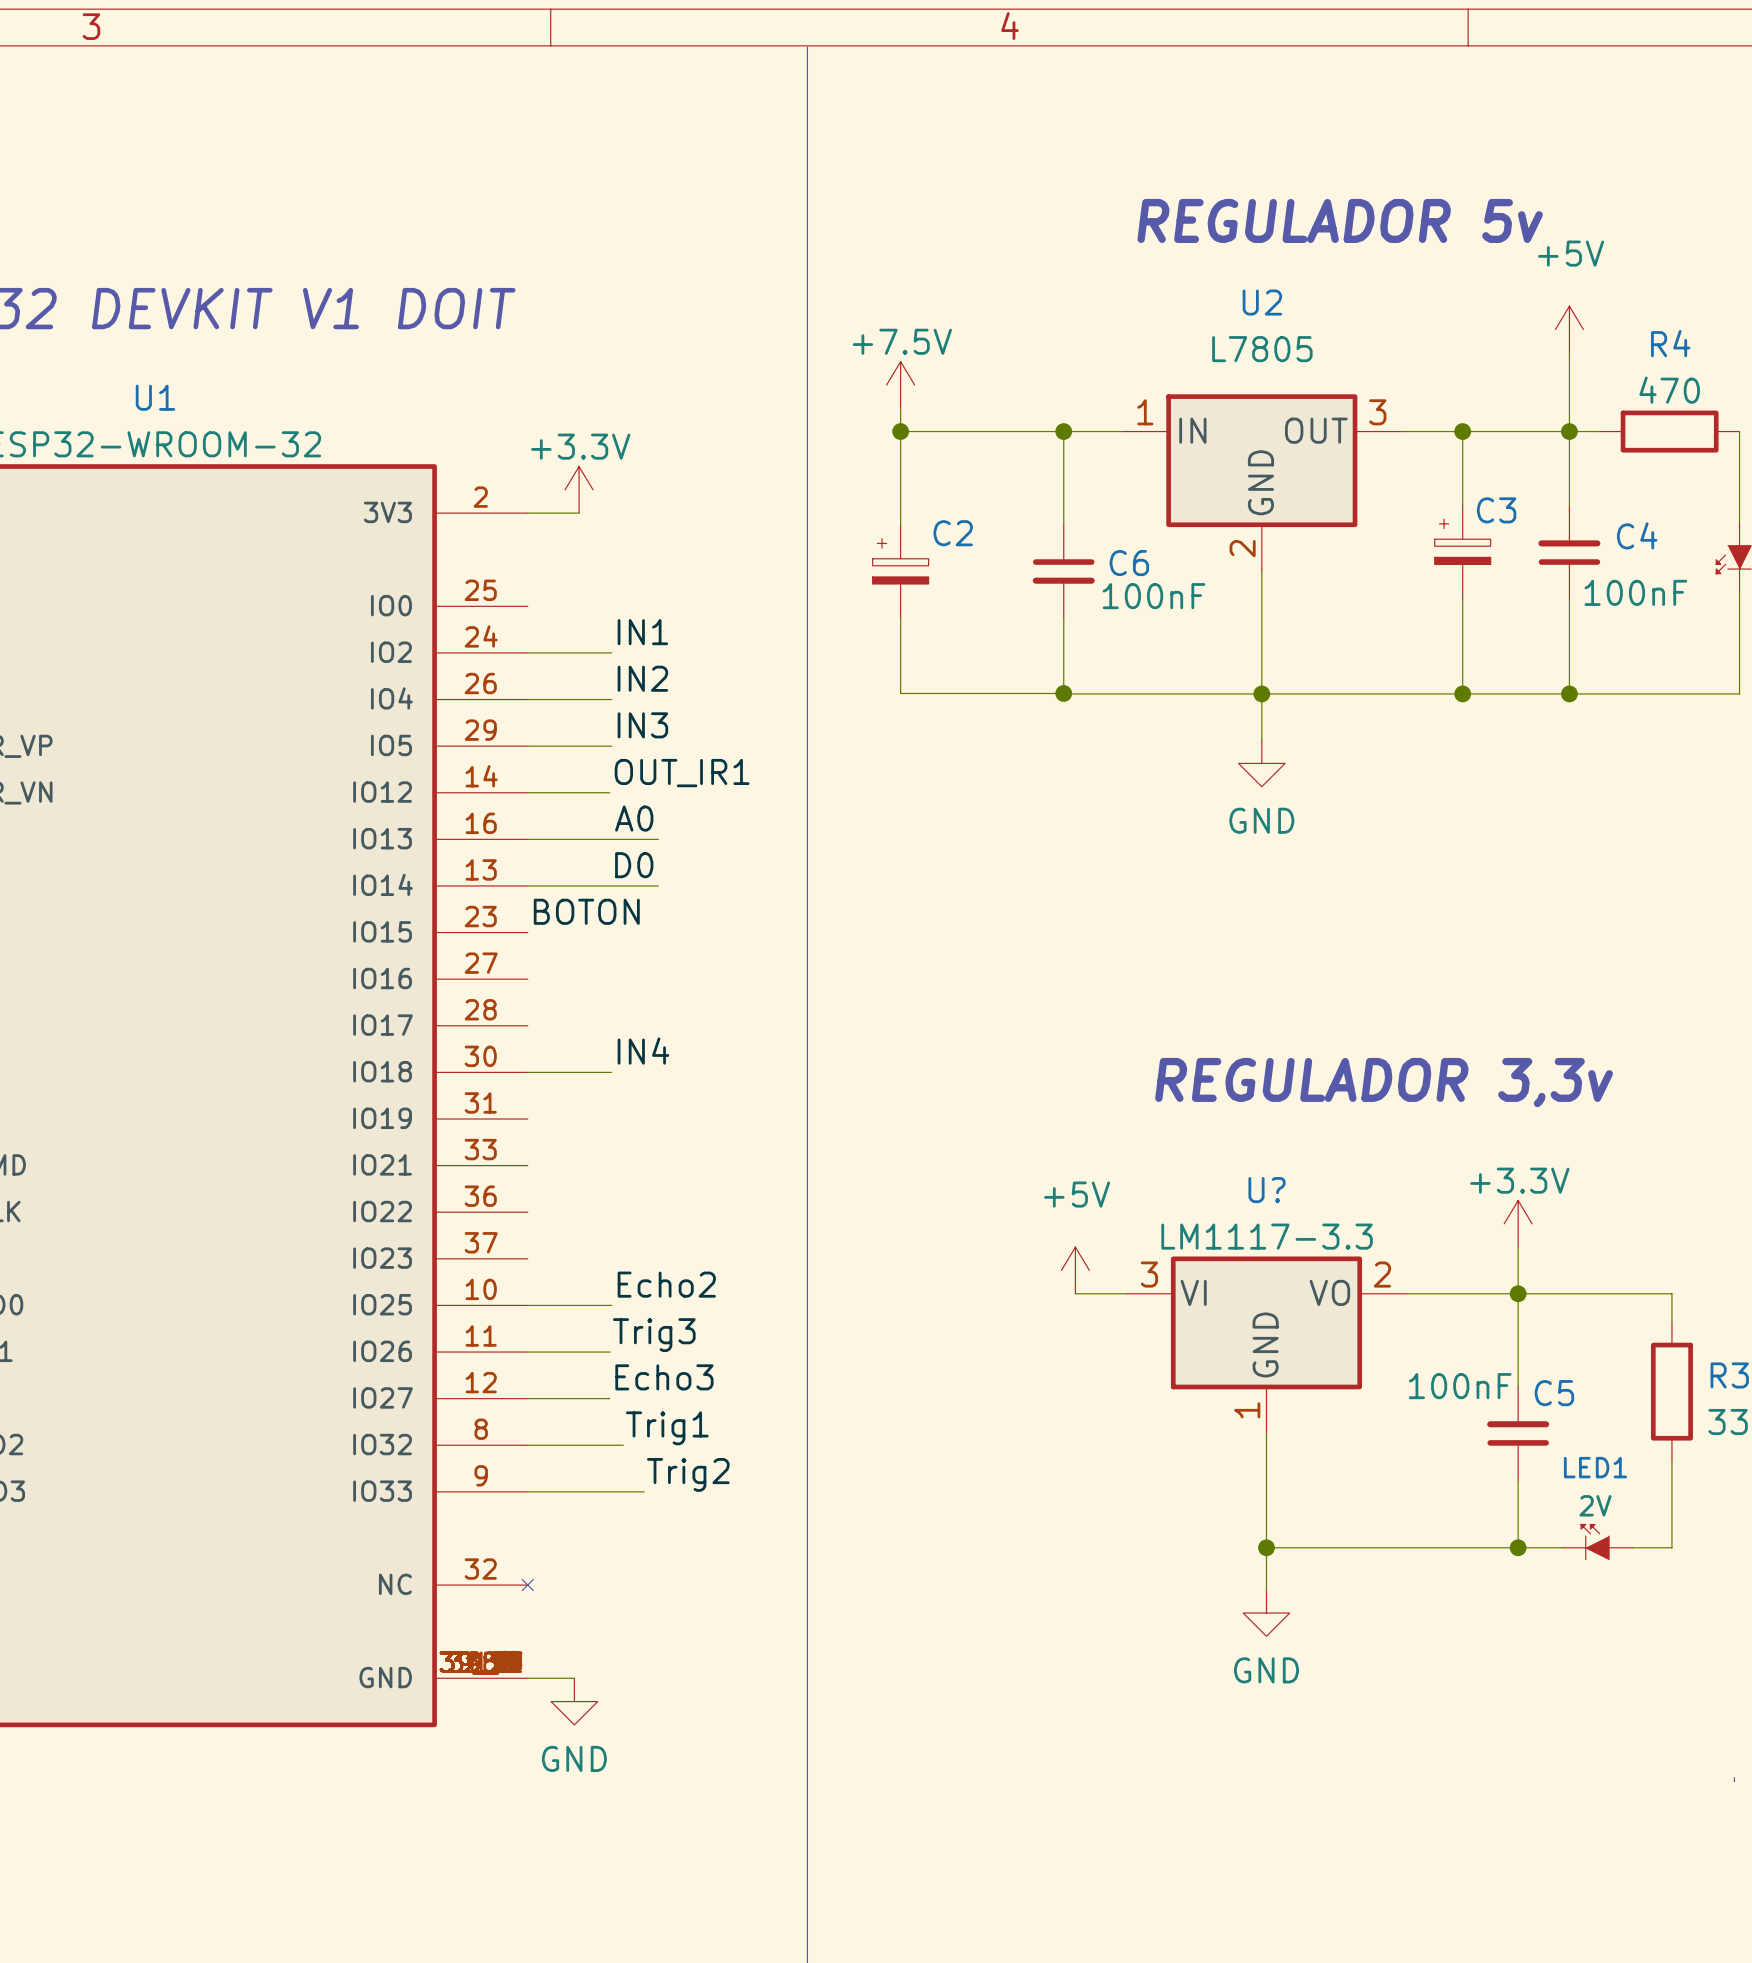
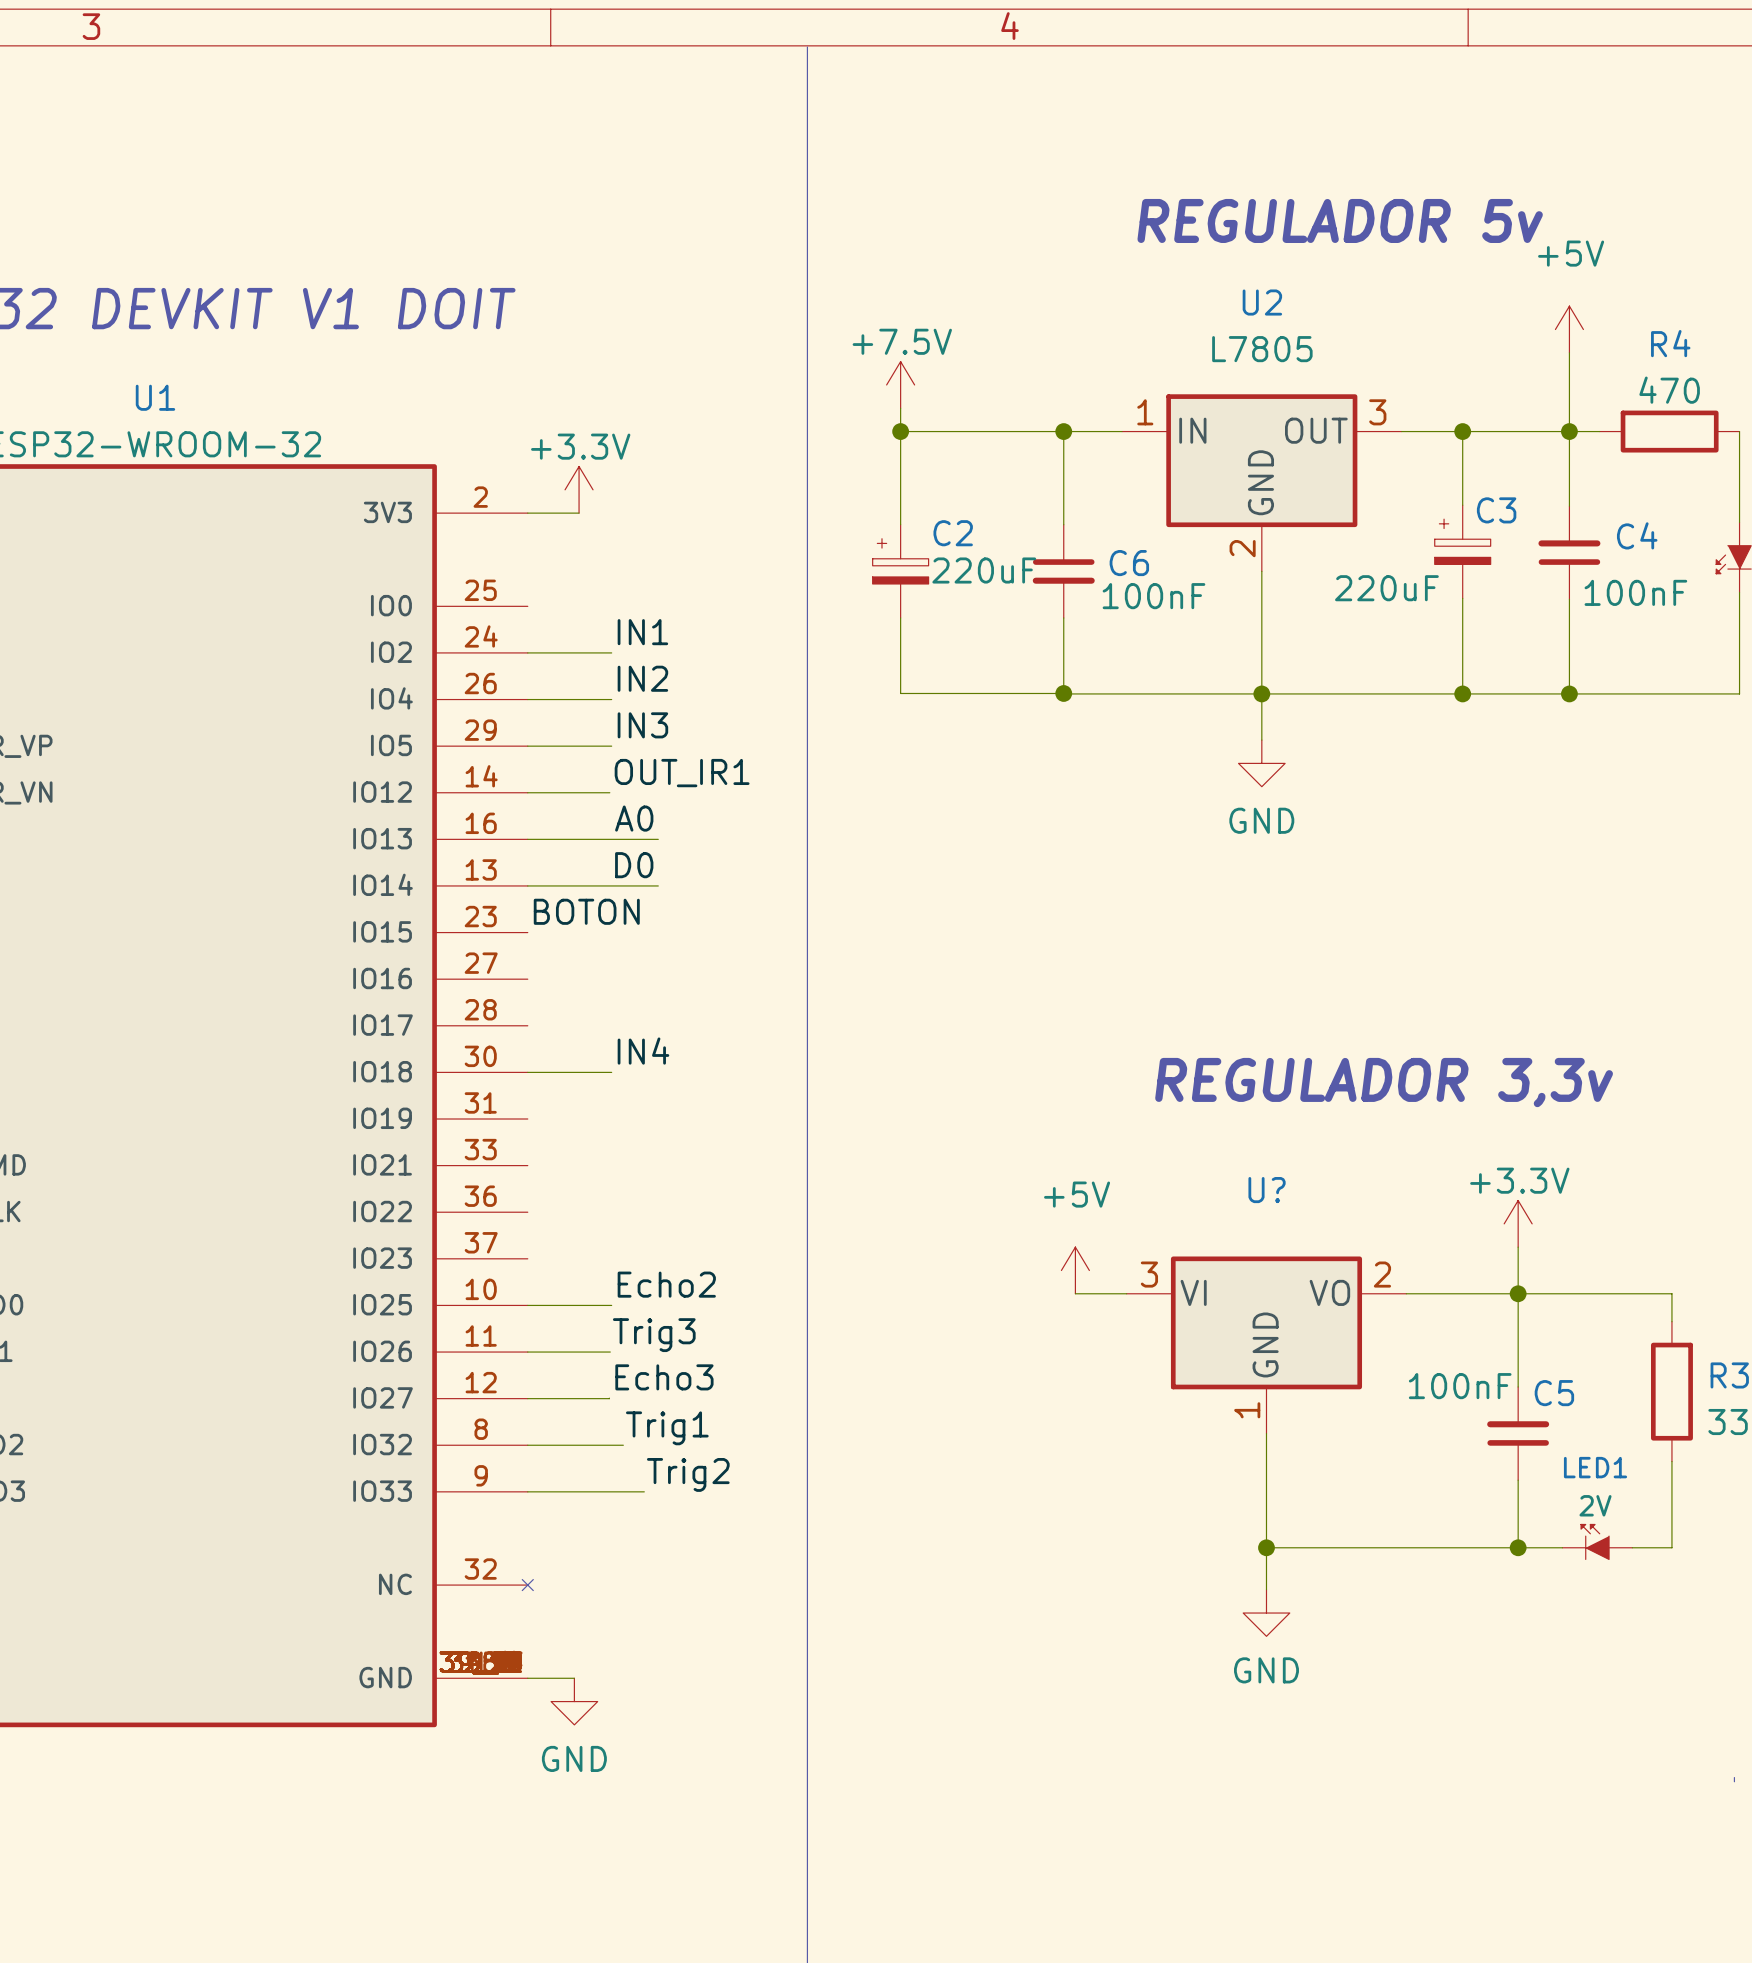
C2 value: none -> 220uF (984, 570)
C3 value: none -> 220uF (1386, 588)
U? value: LM1117-3.3 (1267, 1236) -> none

